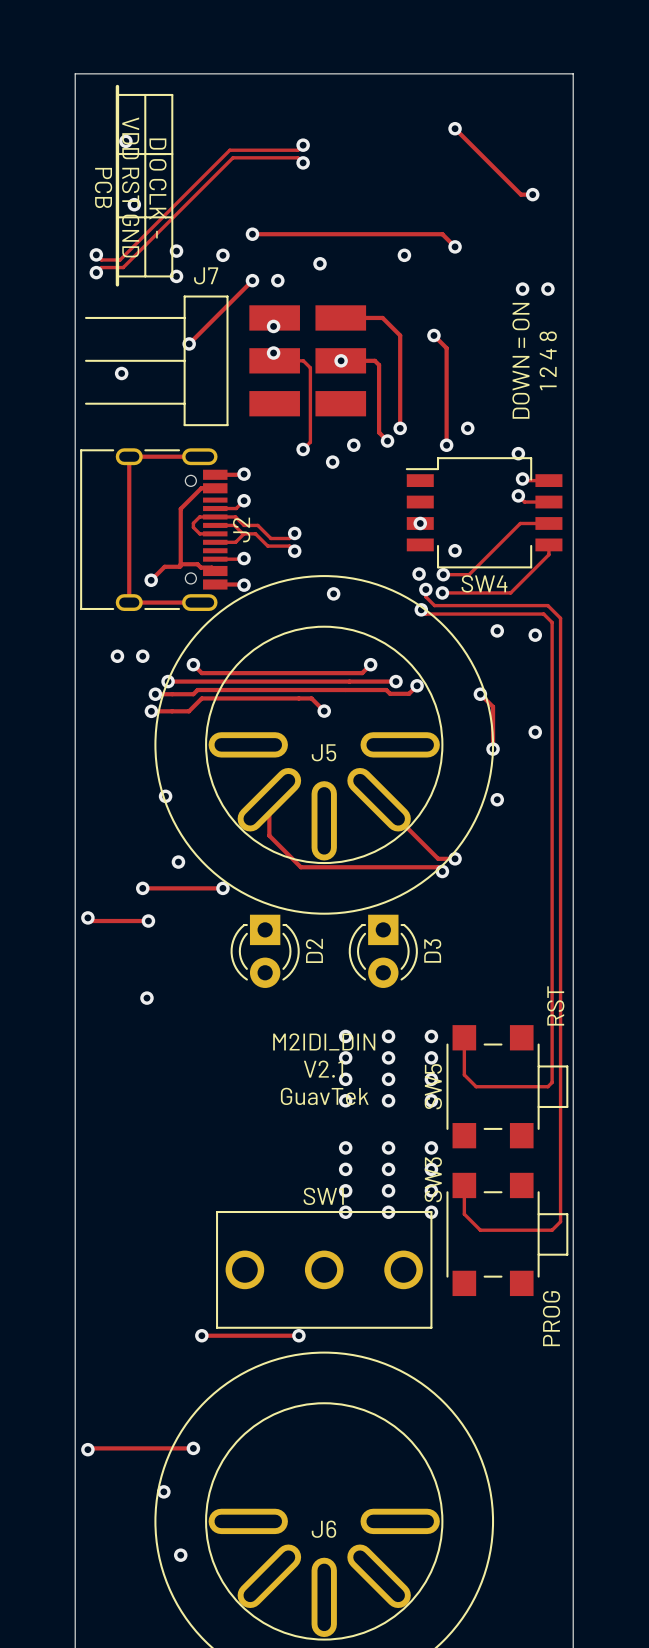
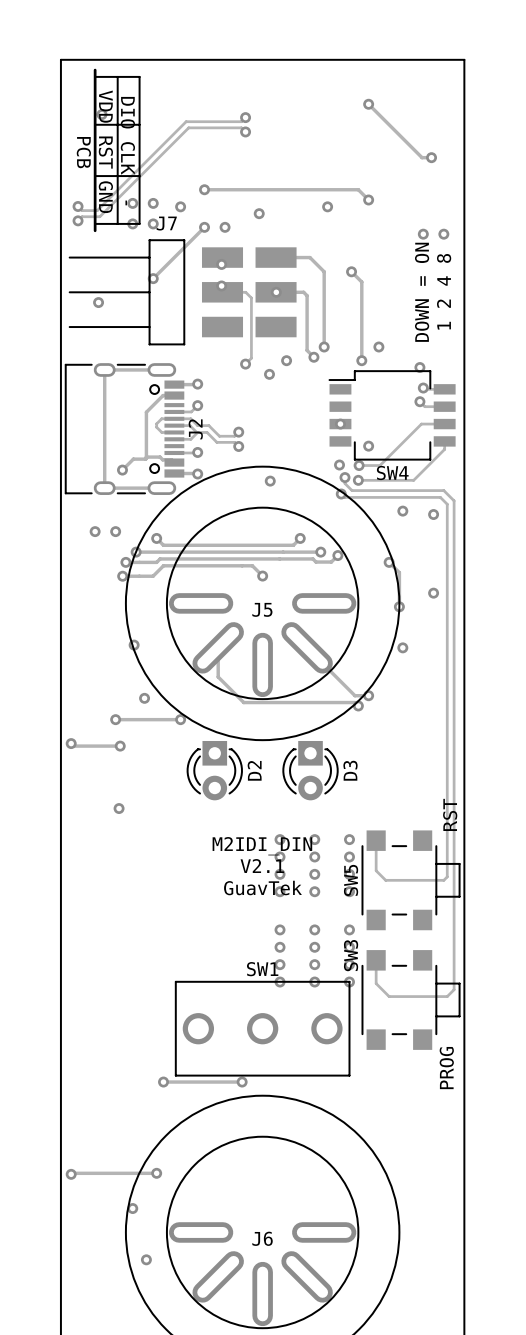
via: (134, 204) -> none
via: none -> (132, 203)
via: (176, 251) -> none
via: none -> (153, 203)
via: none -> (132, 223)
via: (176, 276) -> none
via: none -> (153, 223)

